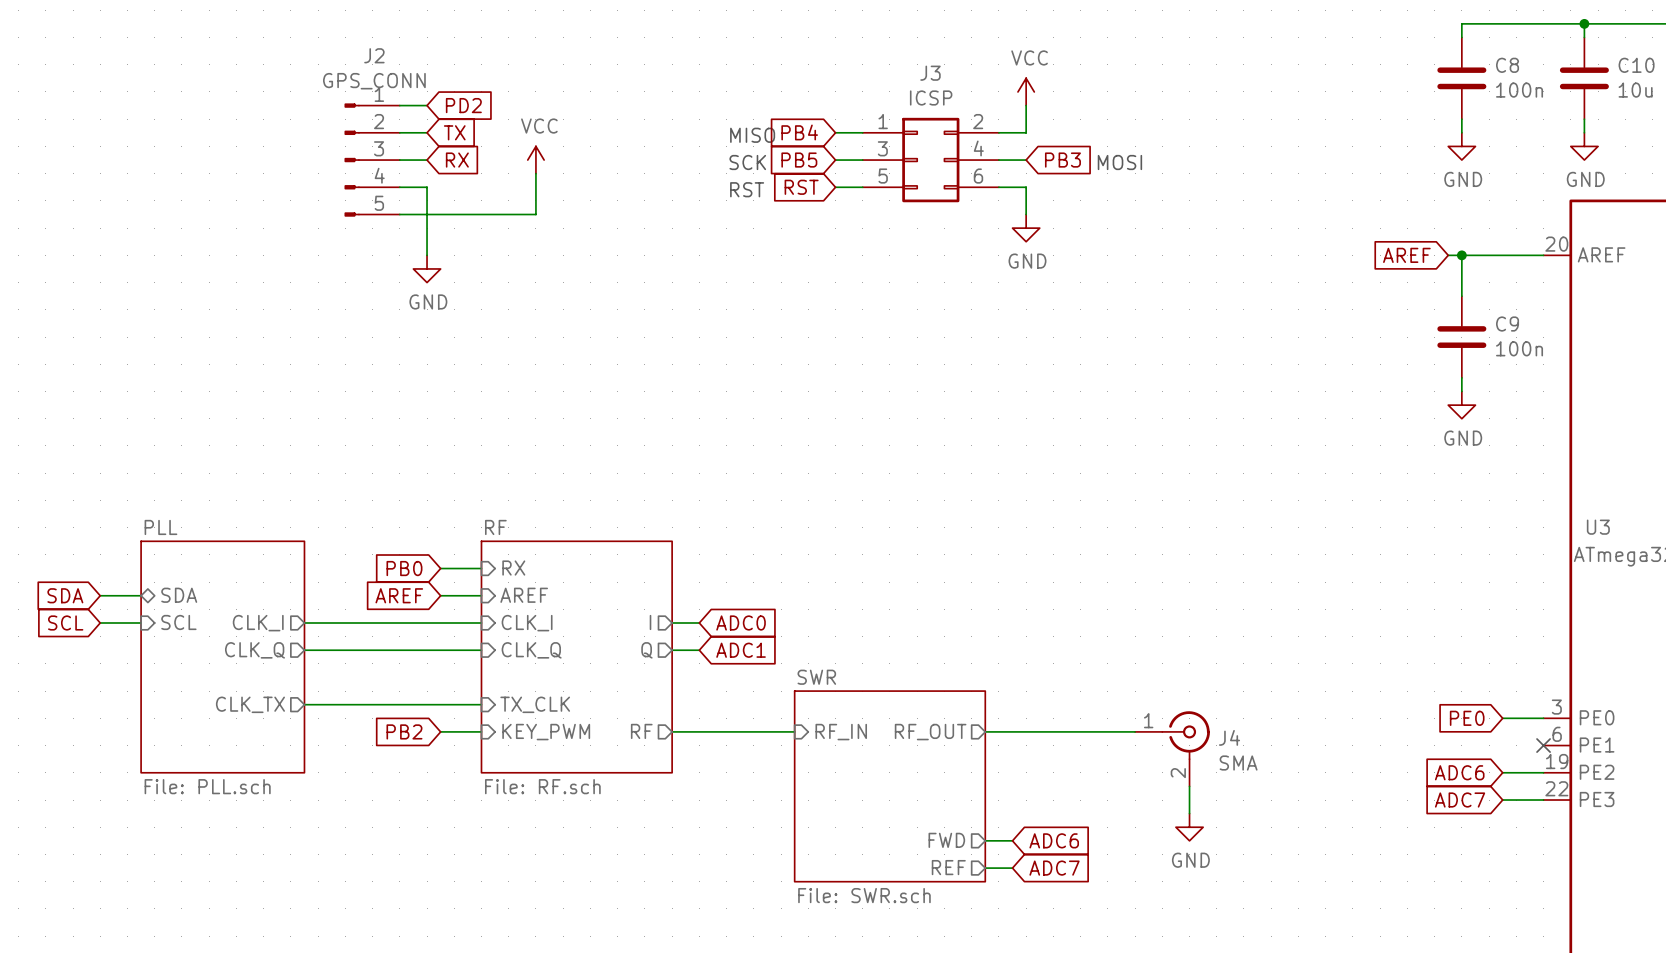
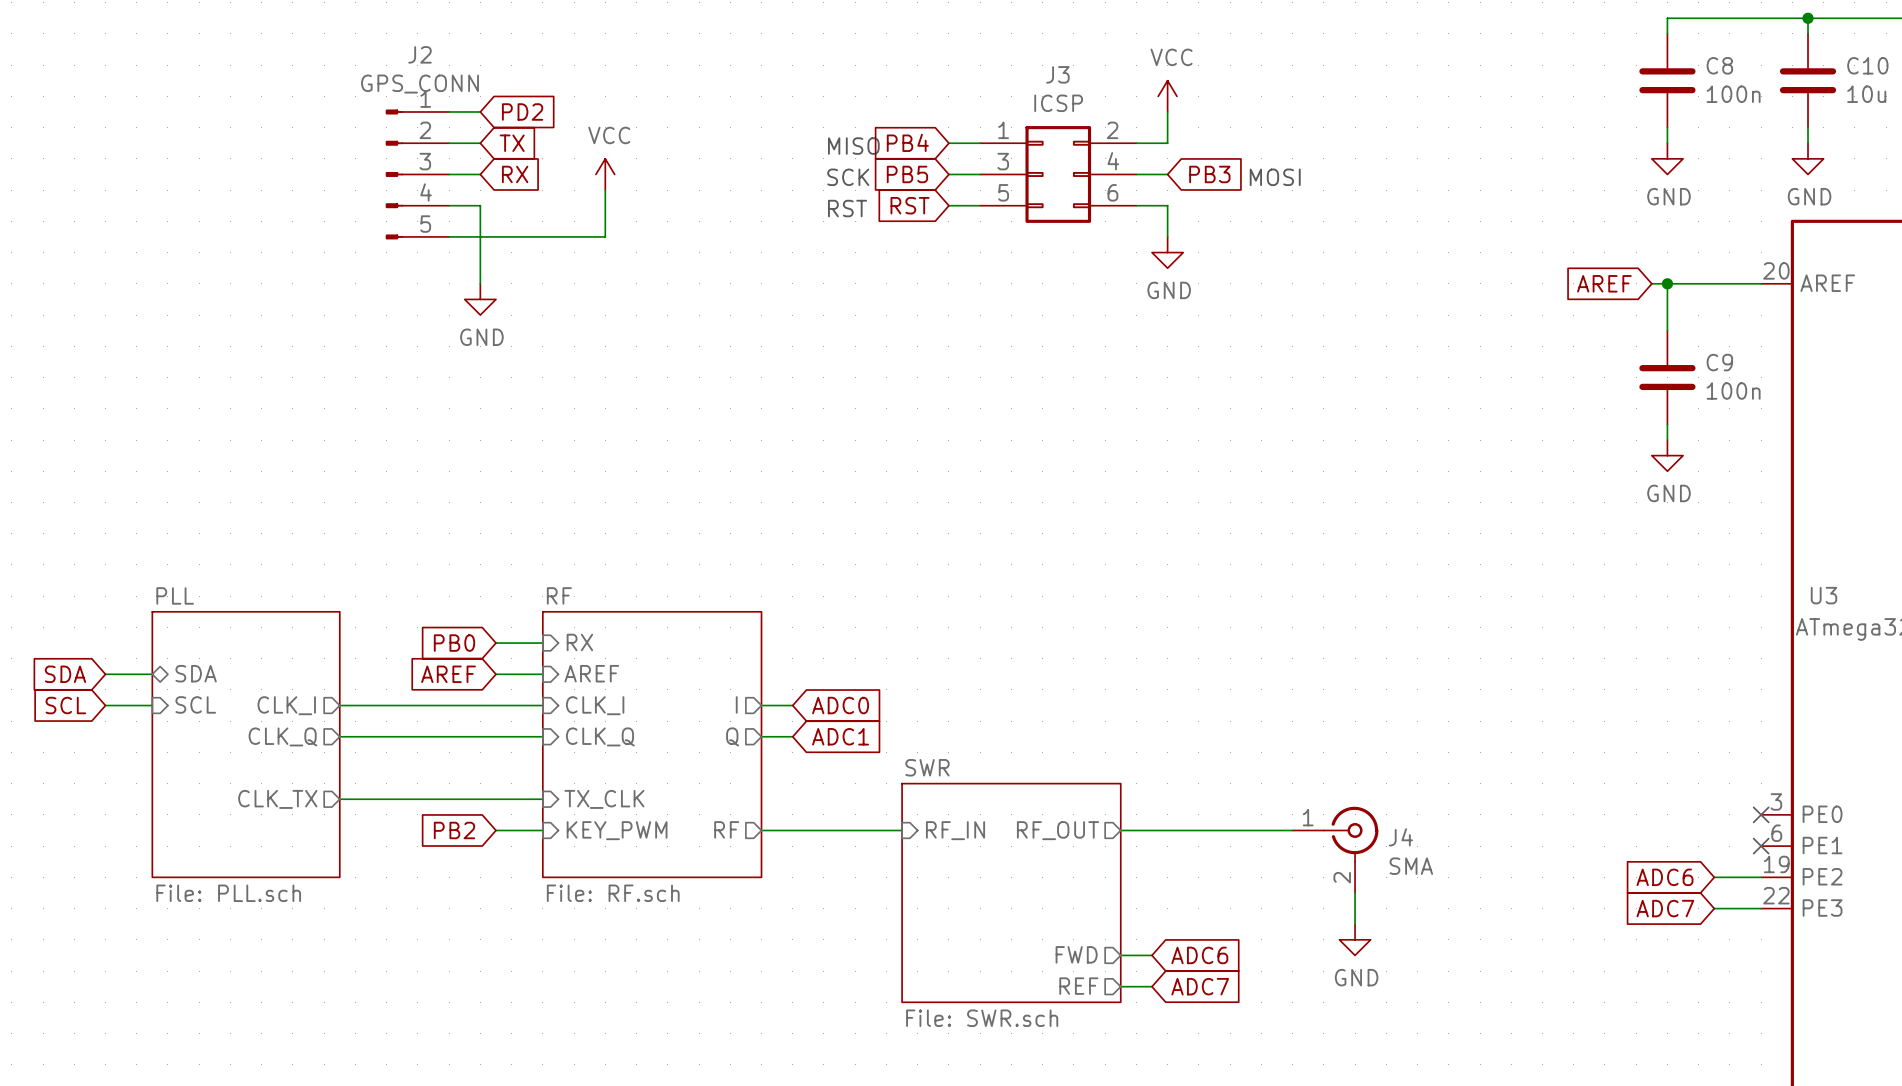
global label: PE0 (1467, 718) -> none
wire: (1502, 718) (1543, 718) -> none
no-connect mark: none -> (1761, 814)

